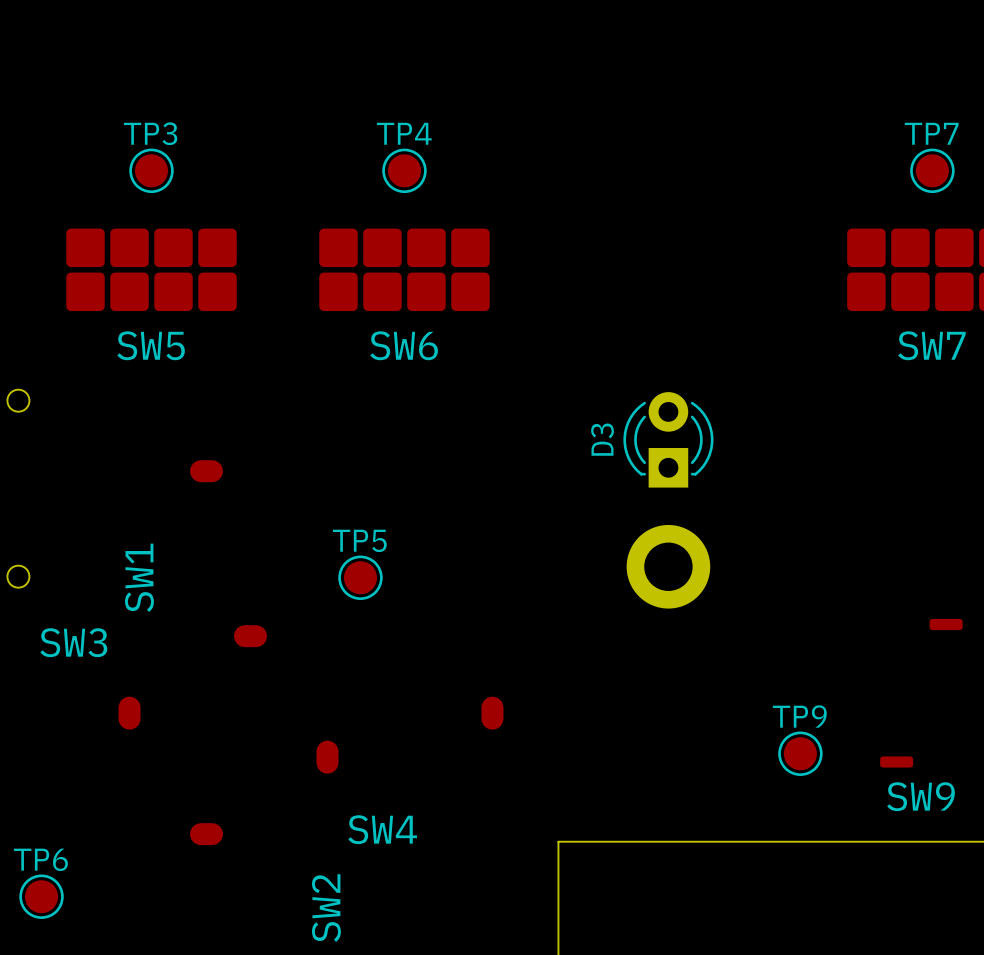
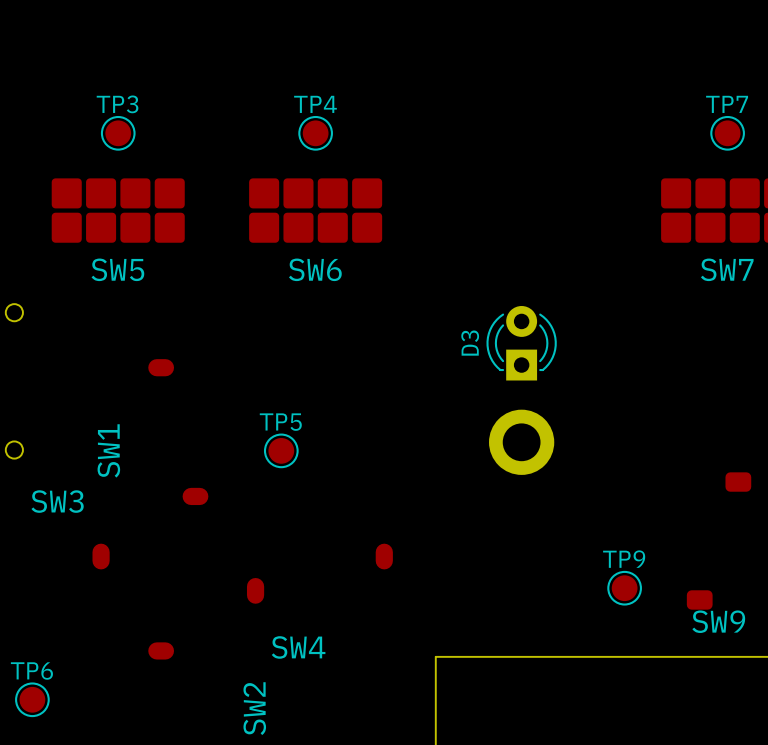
SW9 footprint: [880, 618, 963, 768] -> [686, 472, 752, 610]

